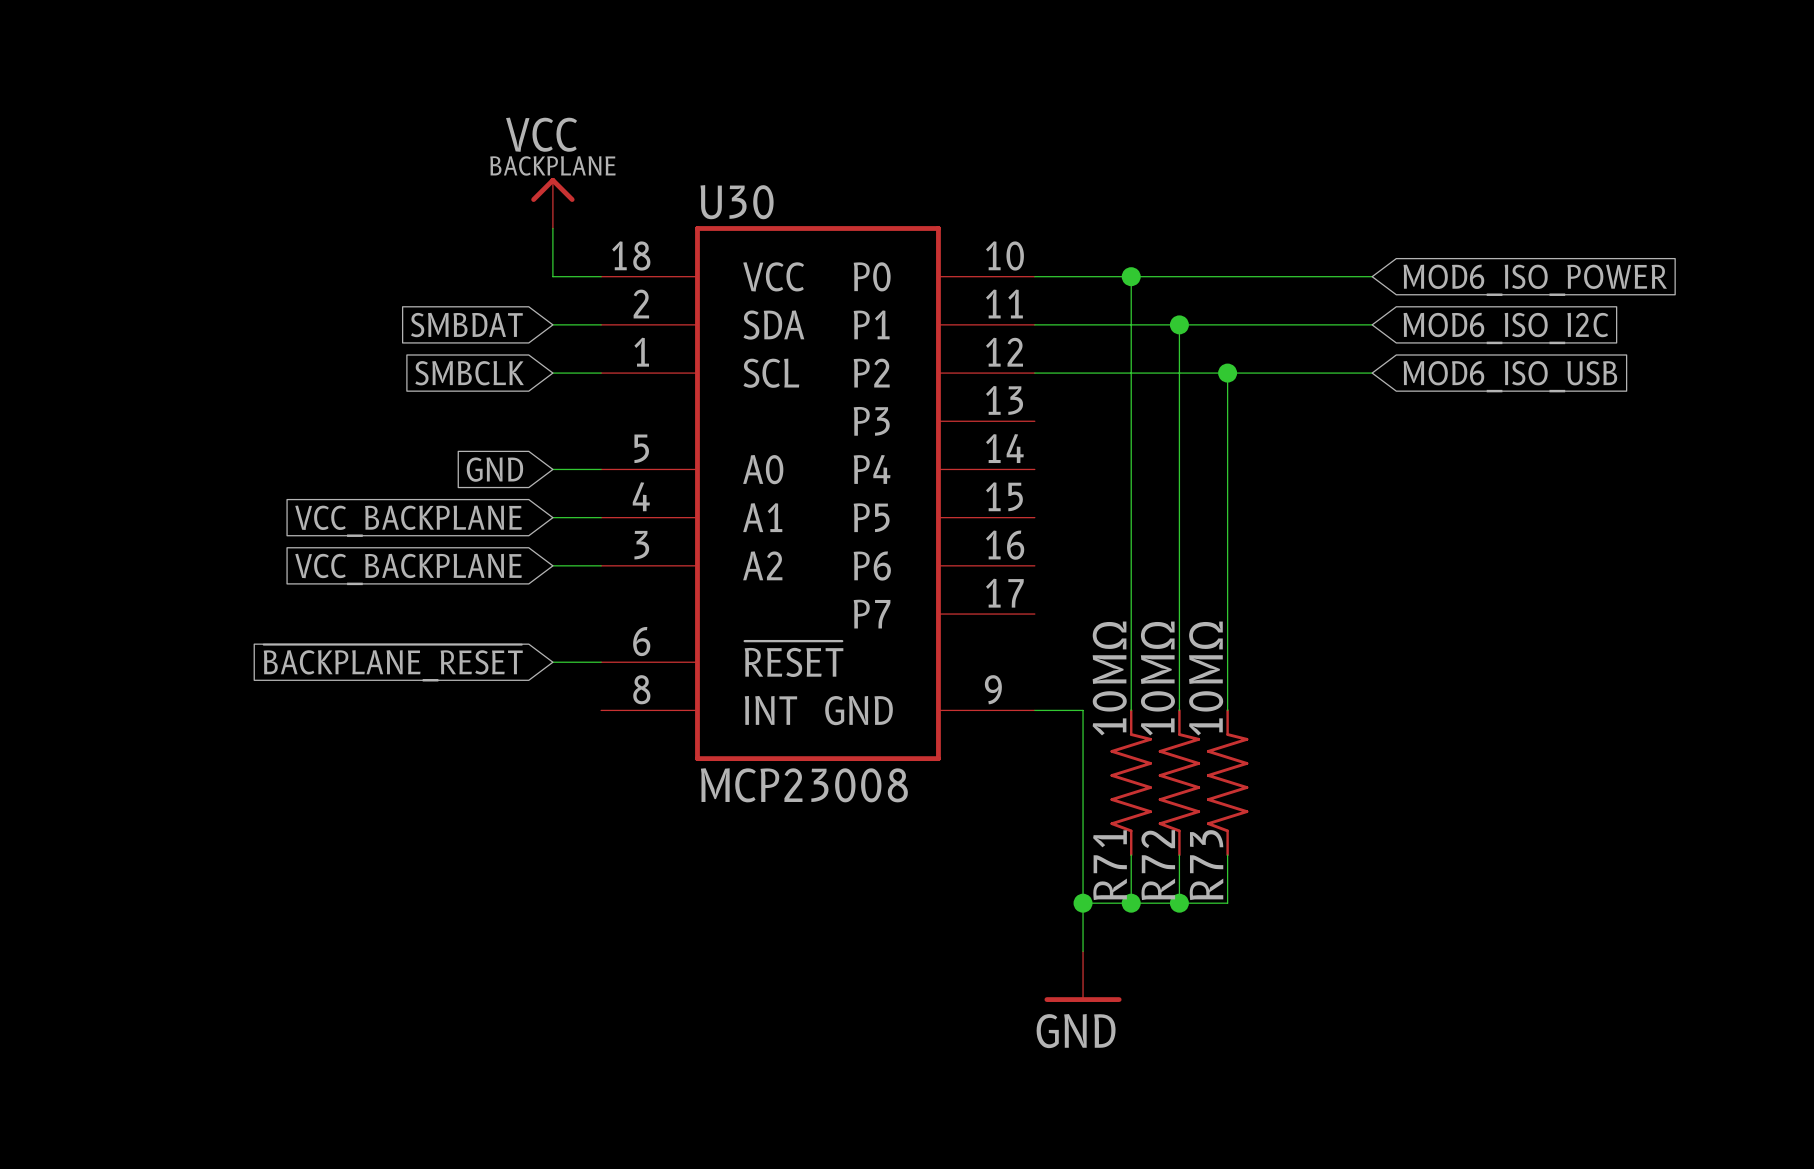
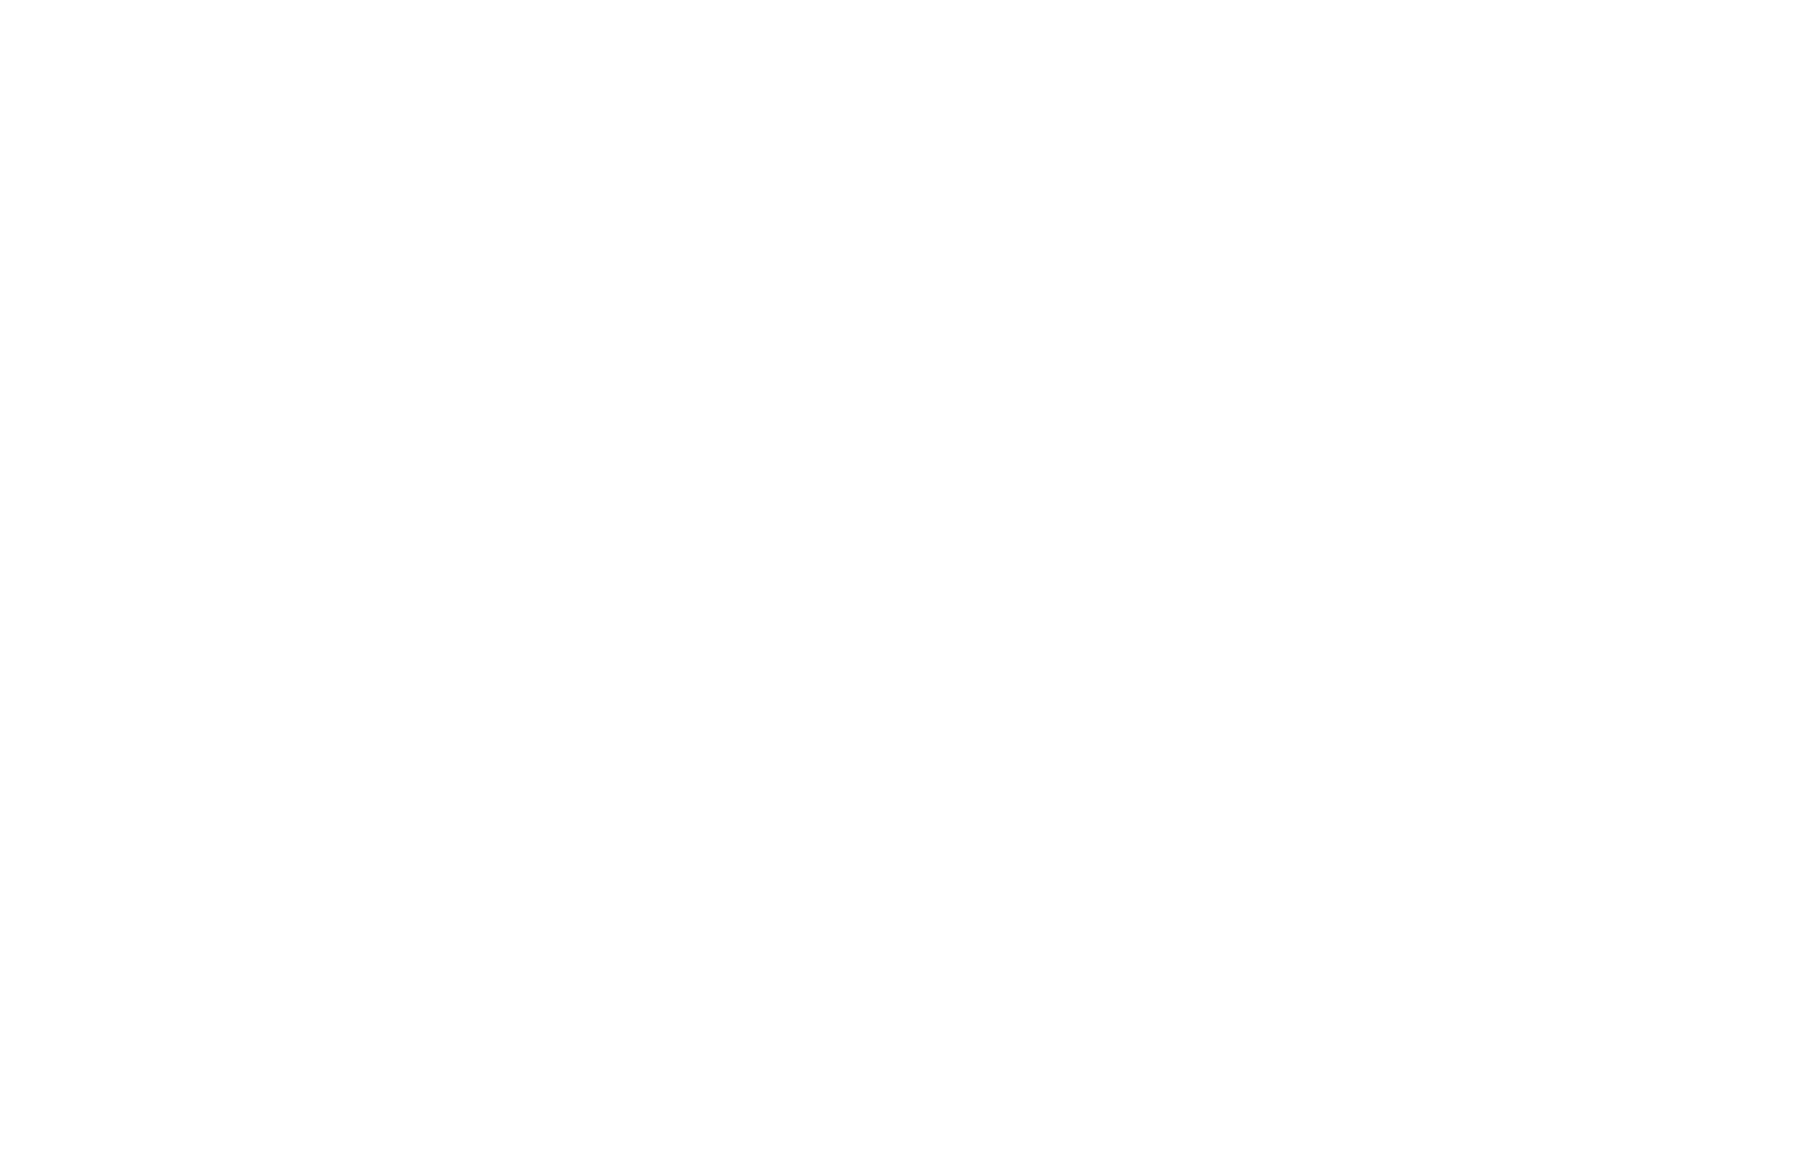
power symbol: (552, 203) -> none
wire: (552, 228) (552, 276) (601, 276) -> none
wire: (1034, 276) (1372, 276) -> none
wire: (1131, 276) (1131, 710) -> none
junction: (1131, 276) -> none
global label: MOD6_ISO_POWER (1535, 280) -> none
wire: (552, 324) (601, 324) -> none
wire: (1034, 324) (1372, 324) -> none
wire: (1179, 324) (1179, 710) -> none
junction: (1179, 324) -> none
global label: SMBDAT (466, 325) -> none
global label: MOD6_ISO_I2C (1505, 328) -> none
global label: SMBCLK (469, 373) -> none
wire: (552, 373) (601, 373) -> none
wire: (1034, 373) (1372, 373) -> none
wire: (1227, 373) (1227, 710) -> none
junction: (1227, 373) -> none
global label: MOD6_ISO_USB (1510, 376) -> none
global label: GND (494, 469) -> none
wire: (552, 469) (601, 469) -> none
U30: MCP23008 (817, 493) -> none
wire: (552, 517) (601, 517) -> none
global label: VCC_BACKPLANE (408, 521) -> none
wire: (552, 565) (601, 565) -> none
global label: VCC_BACKPLANE (408, 569) -> none
wire: (552, 662) (601, 662) -> none
global label: ~{BACKPLANE_RESET} (393, 663) -> none
wire: (1034, 710) (1083, 710) (1083, 951) -> none
R71: 10MΩ (1131, 782) -> none
R72: 10MΩ (1179, 782) -> none
R73: 10MΩ (1227, 782) -> none
wire: (1131, 855) (1131, 903) -> none
wire: (1179, 855) (1179, 903) -> none
wire: (1227, 855) (1227, 903) (1083, 903) -> none
junction: (1083, 903) -> none
junction: (1131, 903) -> none
junction: (1179, 903) -> none
power symbol: GND (1083, 976) -> none

